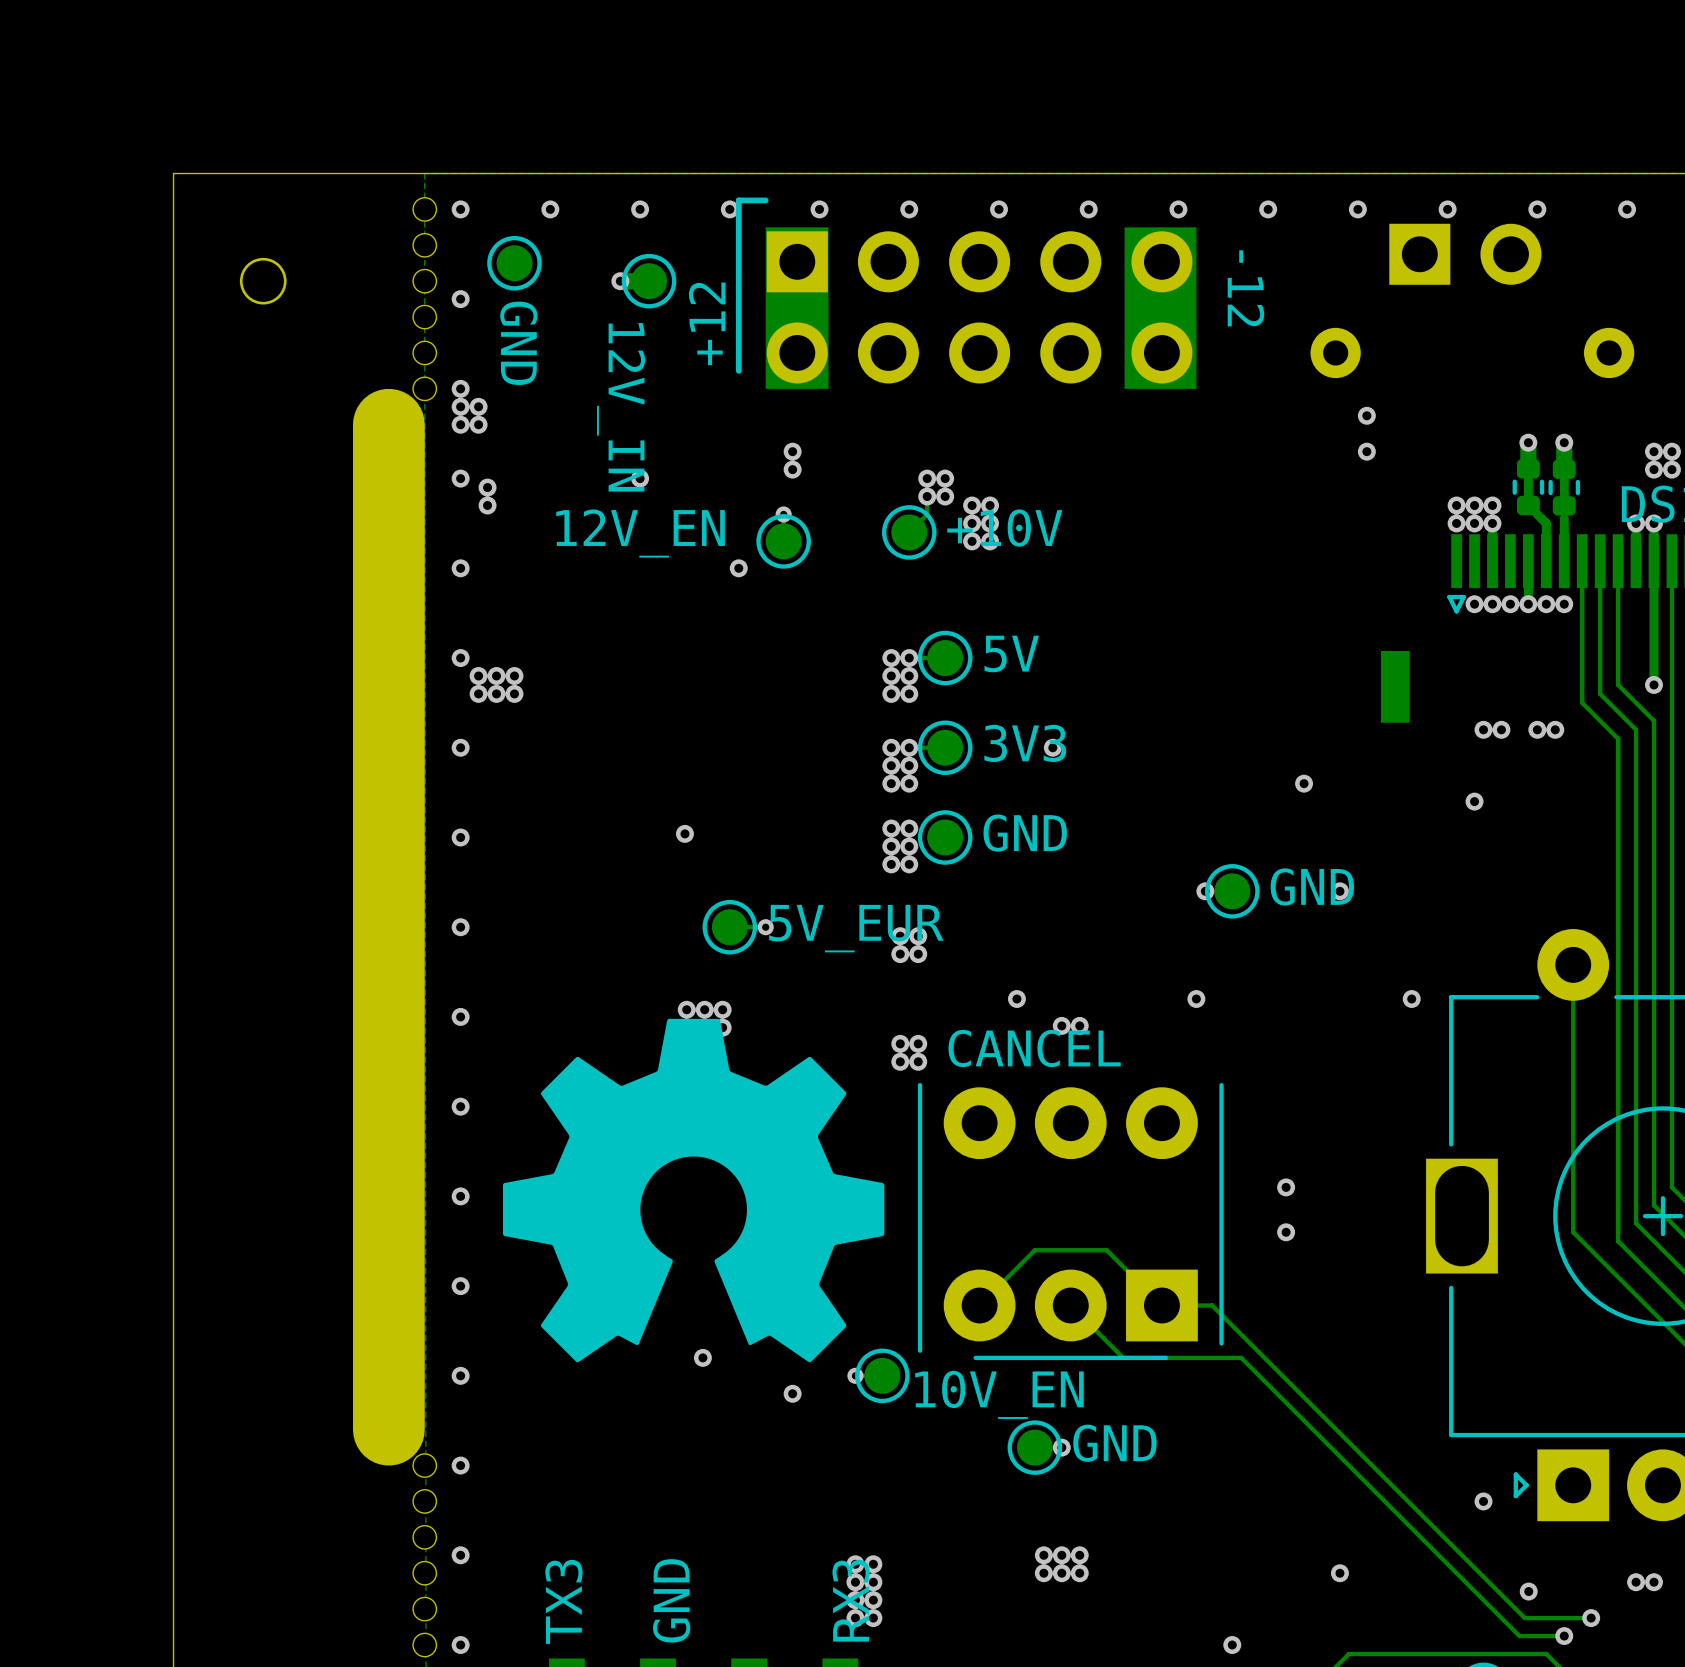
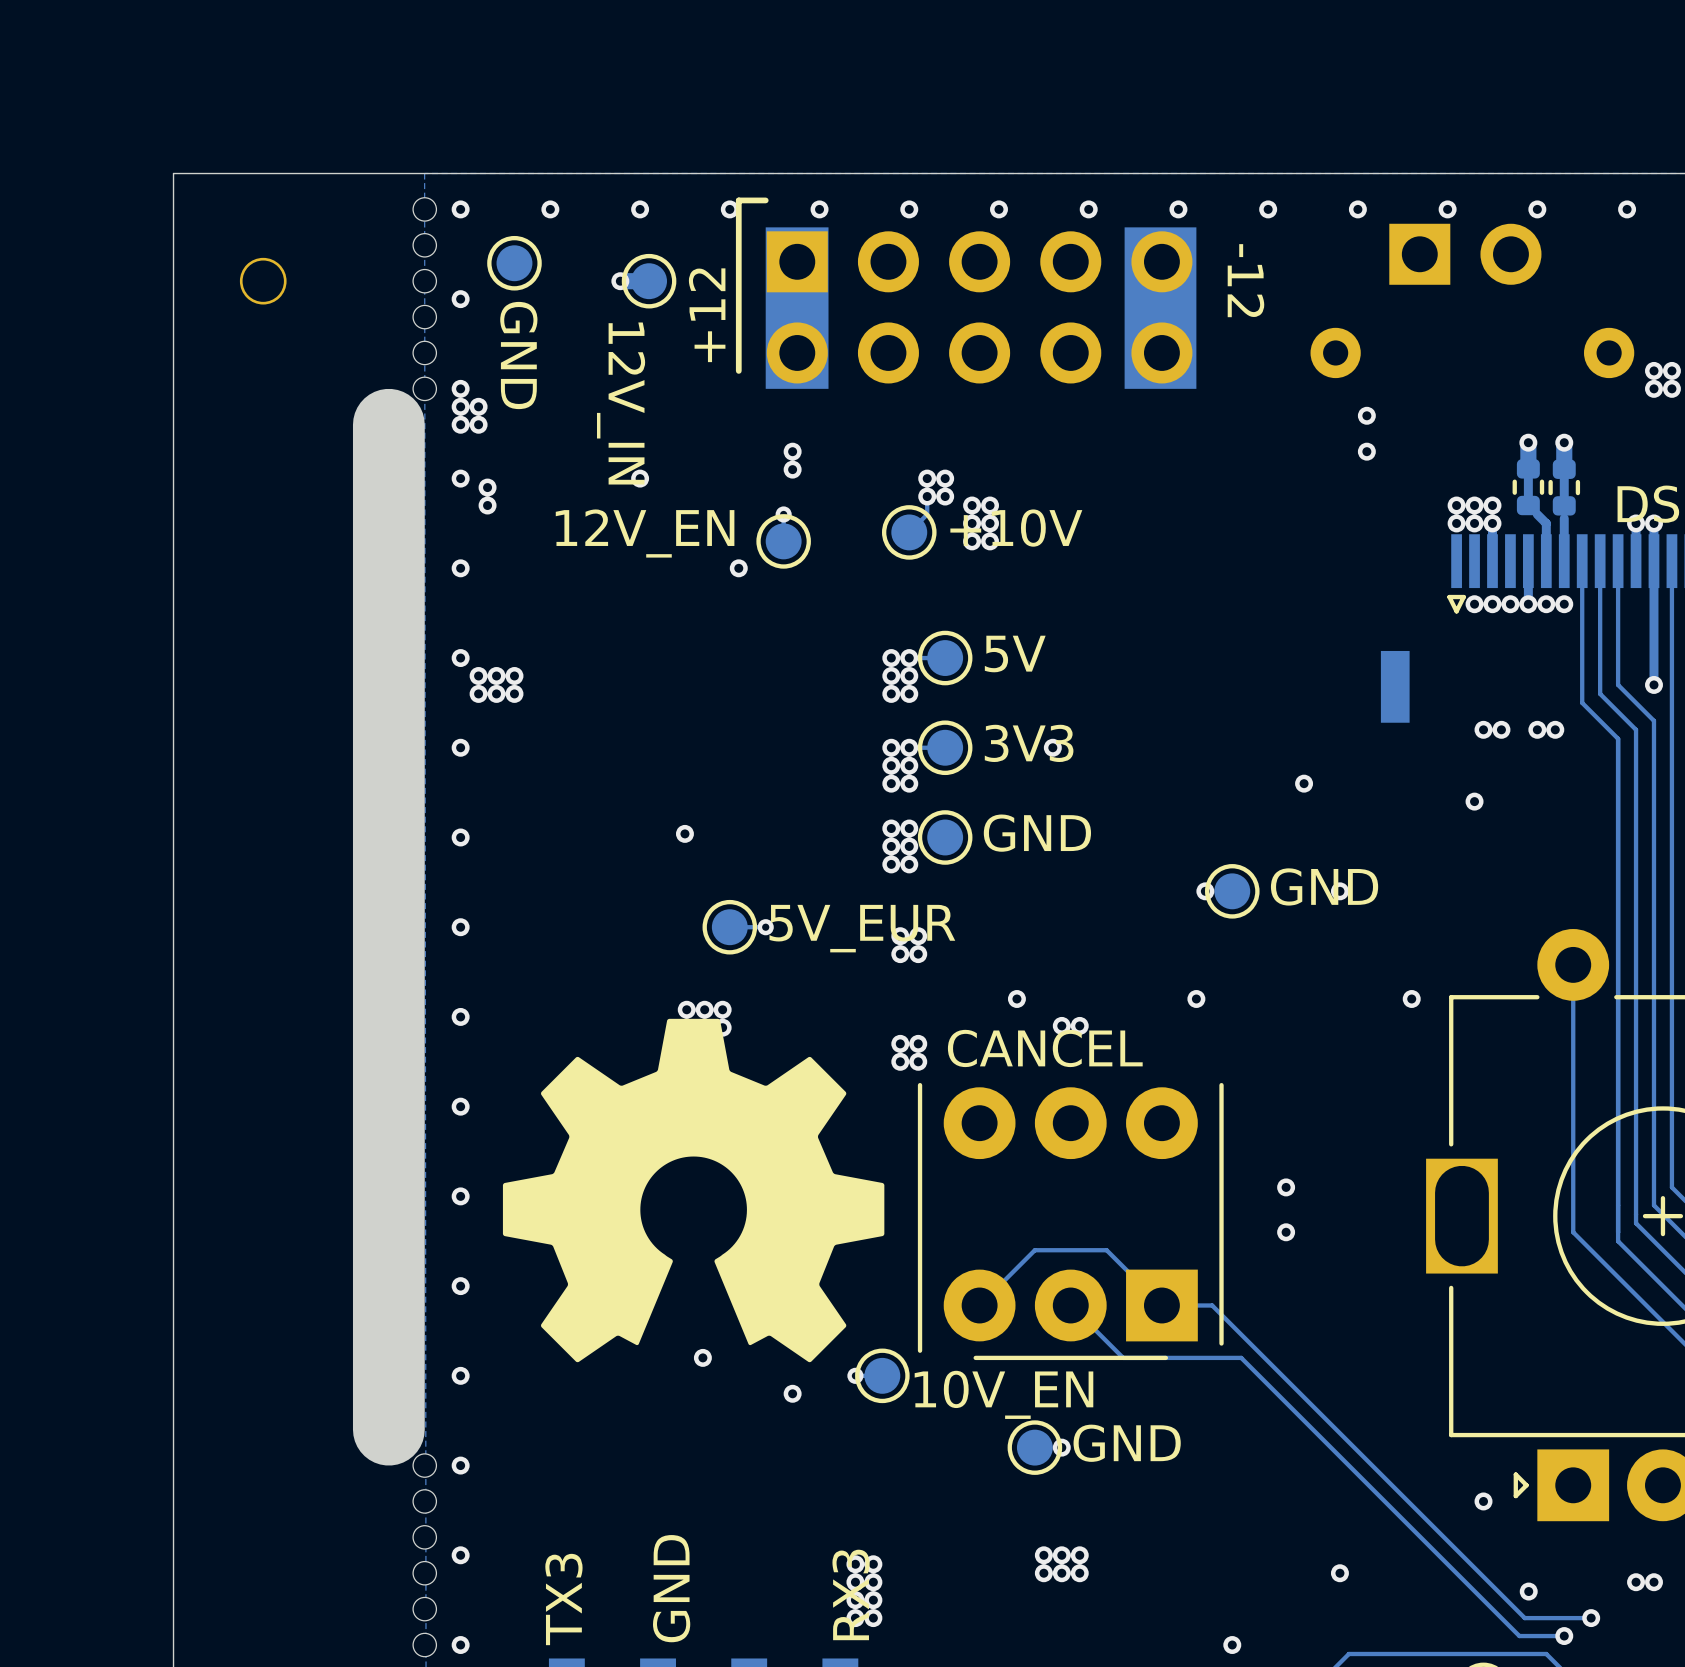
via: none -> (1653, 370)
via: none -> (1671, 370)
via: none -> (1653, 388)
via: none -> (1671, 388)
via: (1653, 451) -> none
via: (1671, 451) -> none
via: (1653, 469) -> none
via: (1671, 469) -> none

